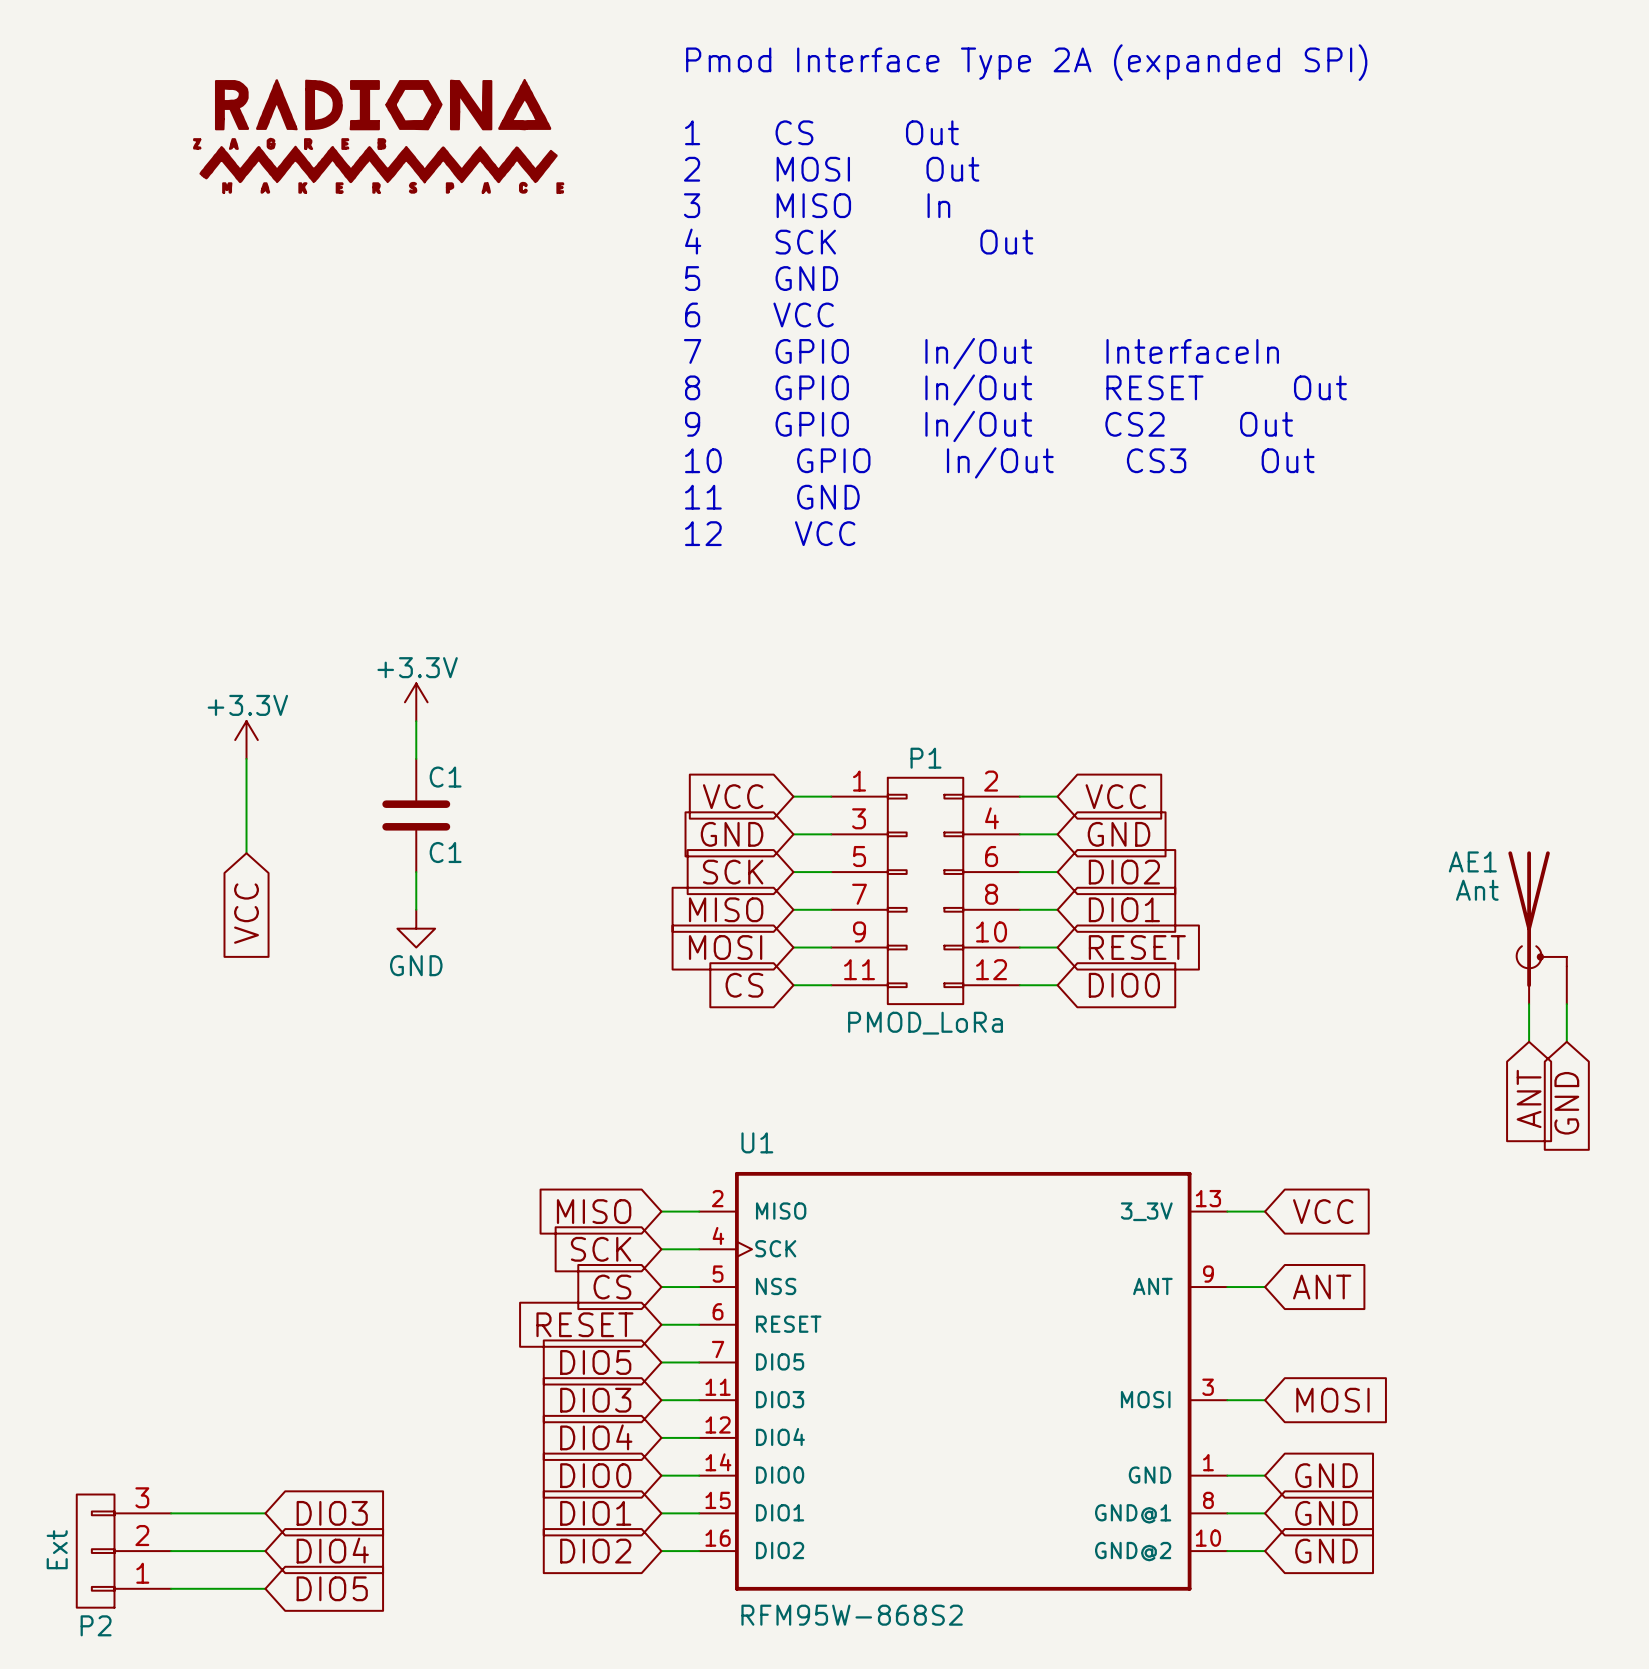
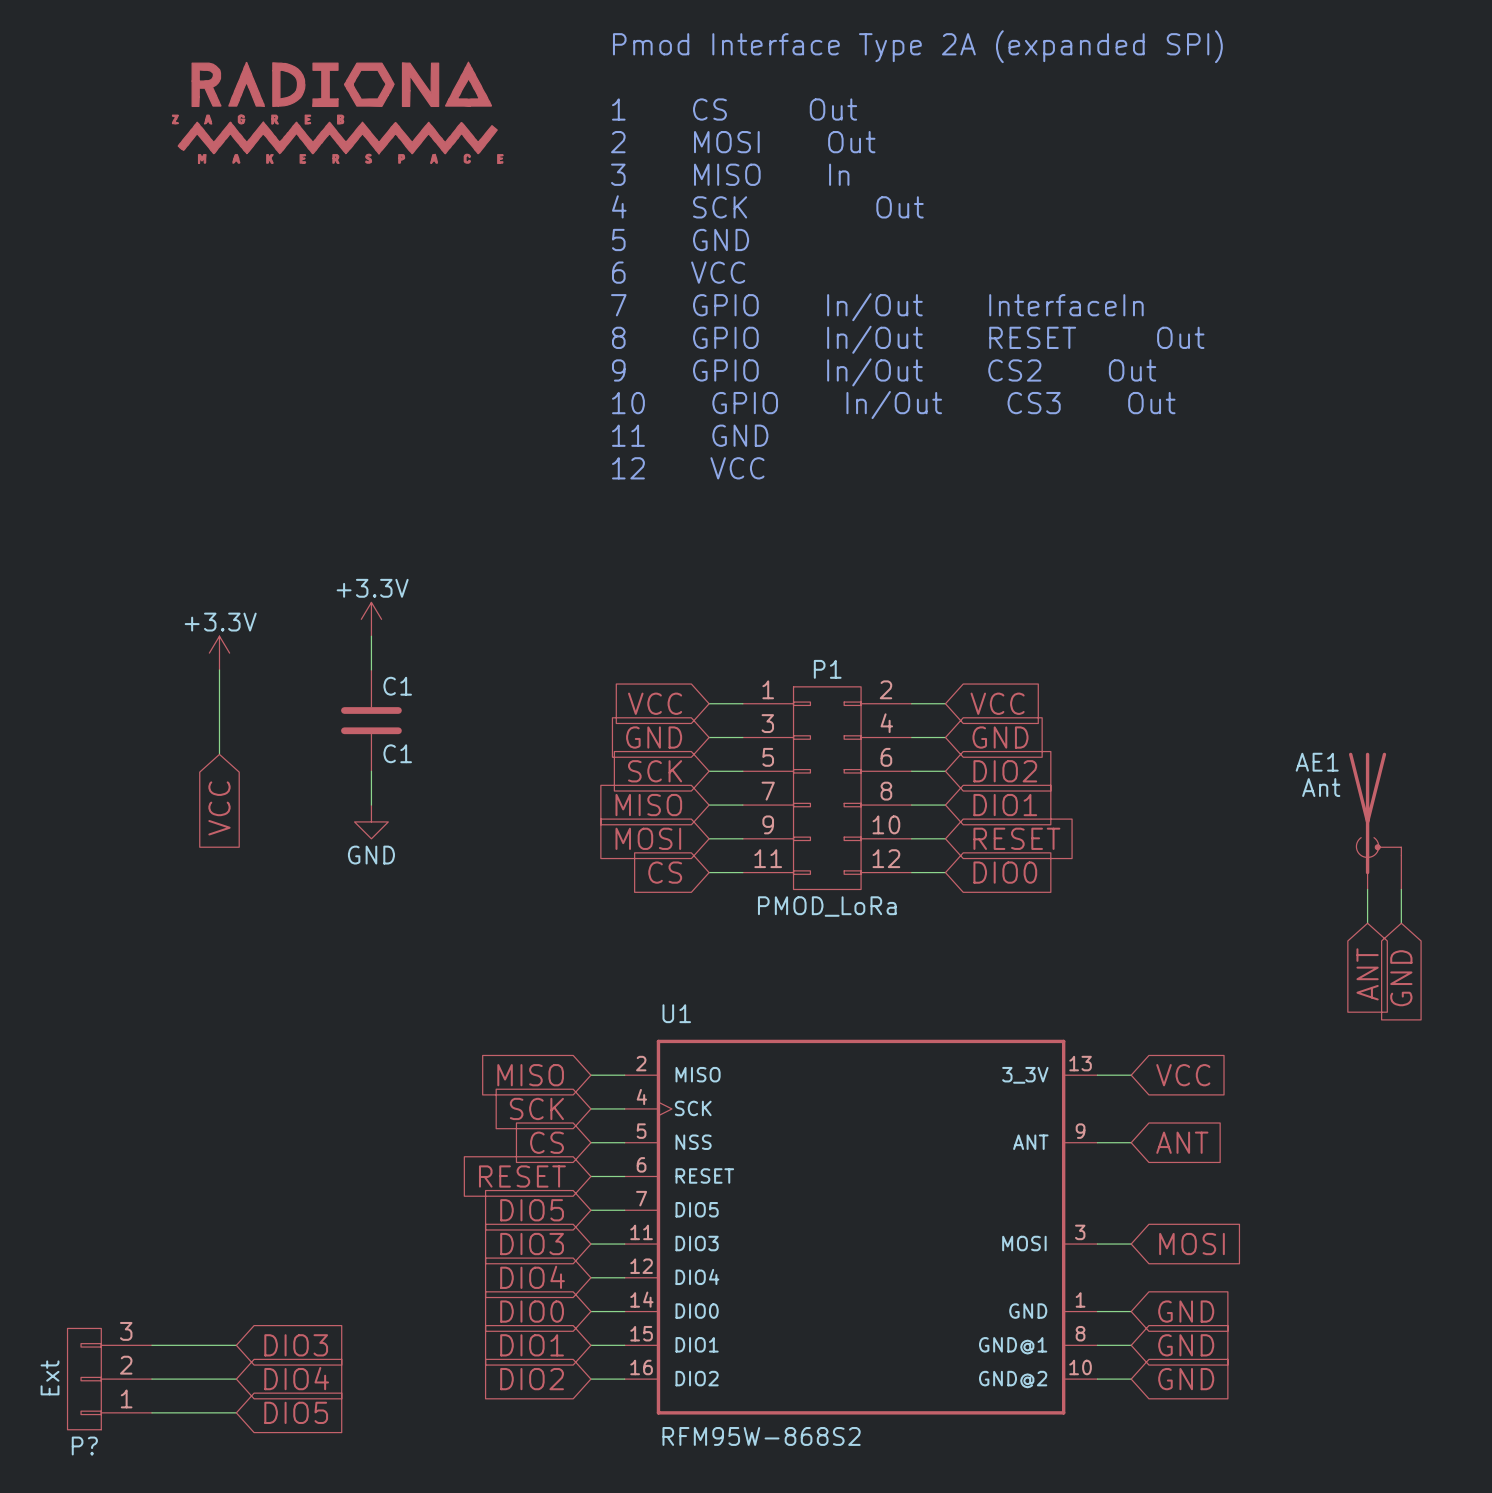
P2 name: P2 (96, 1625) -> P? (84, 1446)

